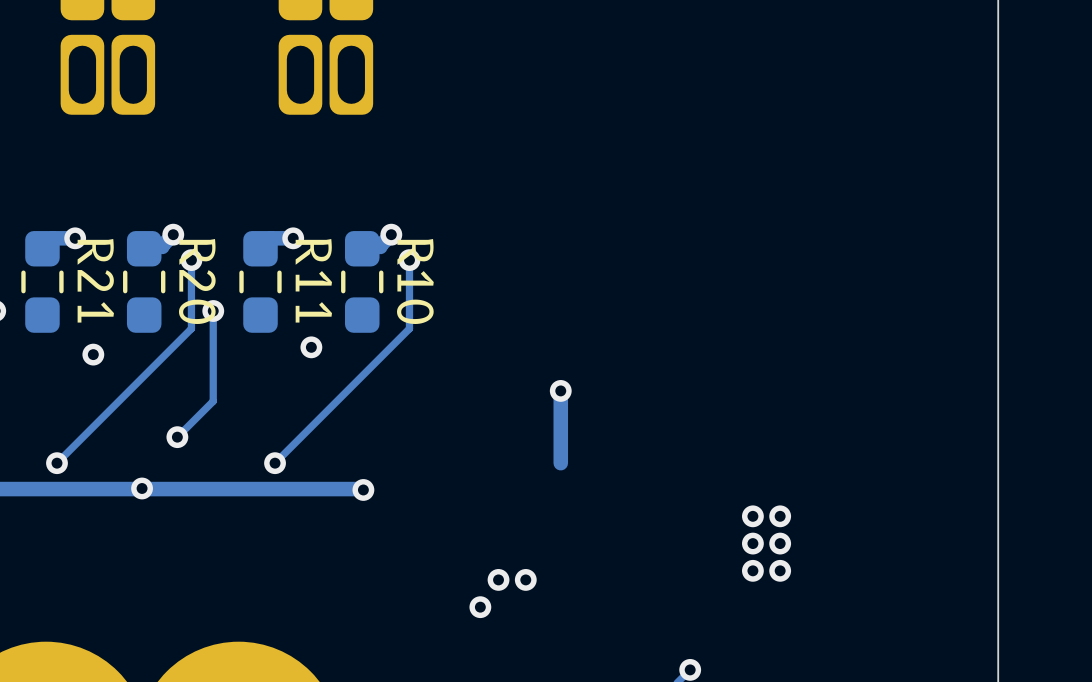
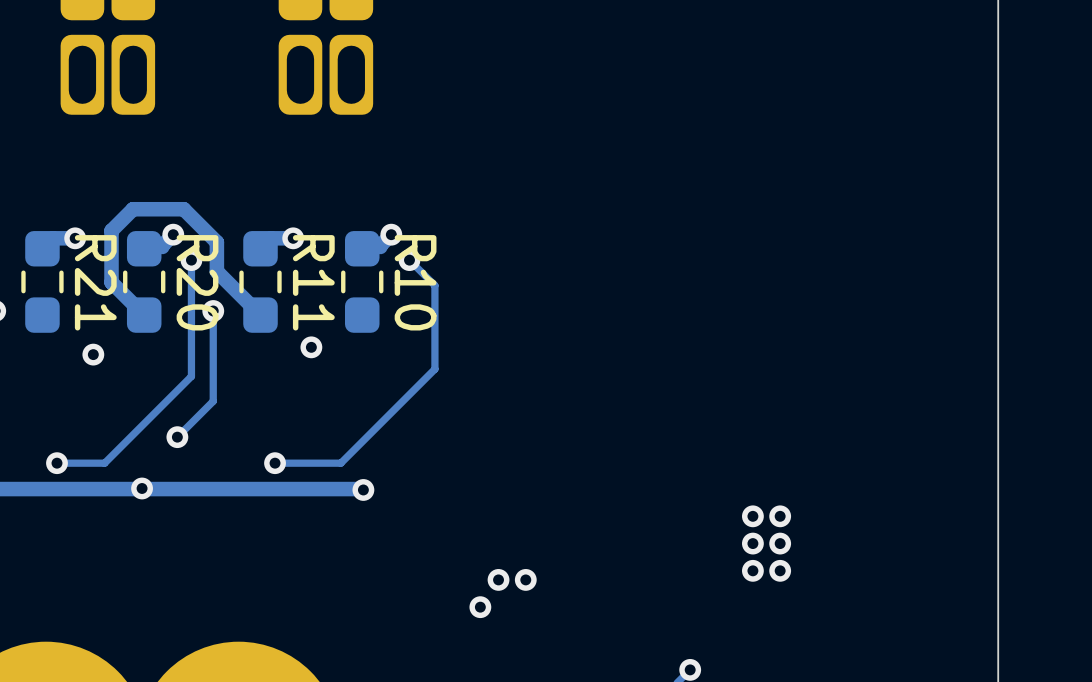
track: (409, 260) (409, 328) (275, 463) -> (409, 260) (434, 285) (434, 369) (340, 463) (275, 463)
track: none -> (260, 315) (216, 271) (216, 242) (183, 209) (133, 209) (111, 230) (111, 282) (144, 315)
track: (191, 328) (56, 463) -> (191, 328) (191, 376) (104, 463) (56, 463)
track: (560, 390) (560, 463) -> none
via: (560, 390) -> none

